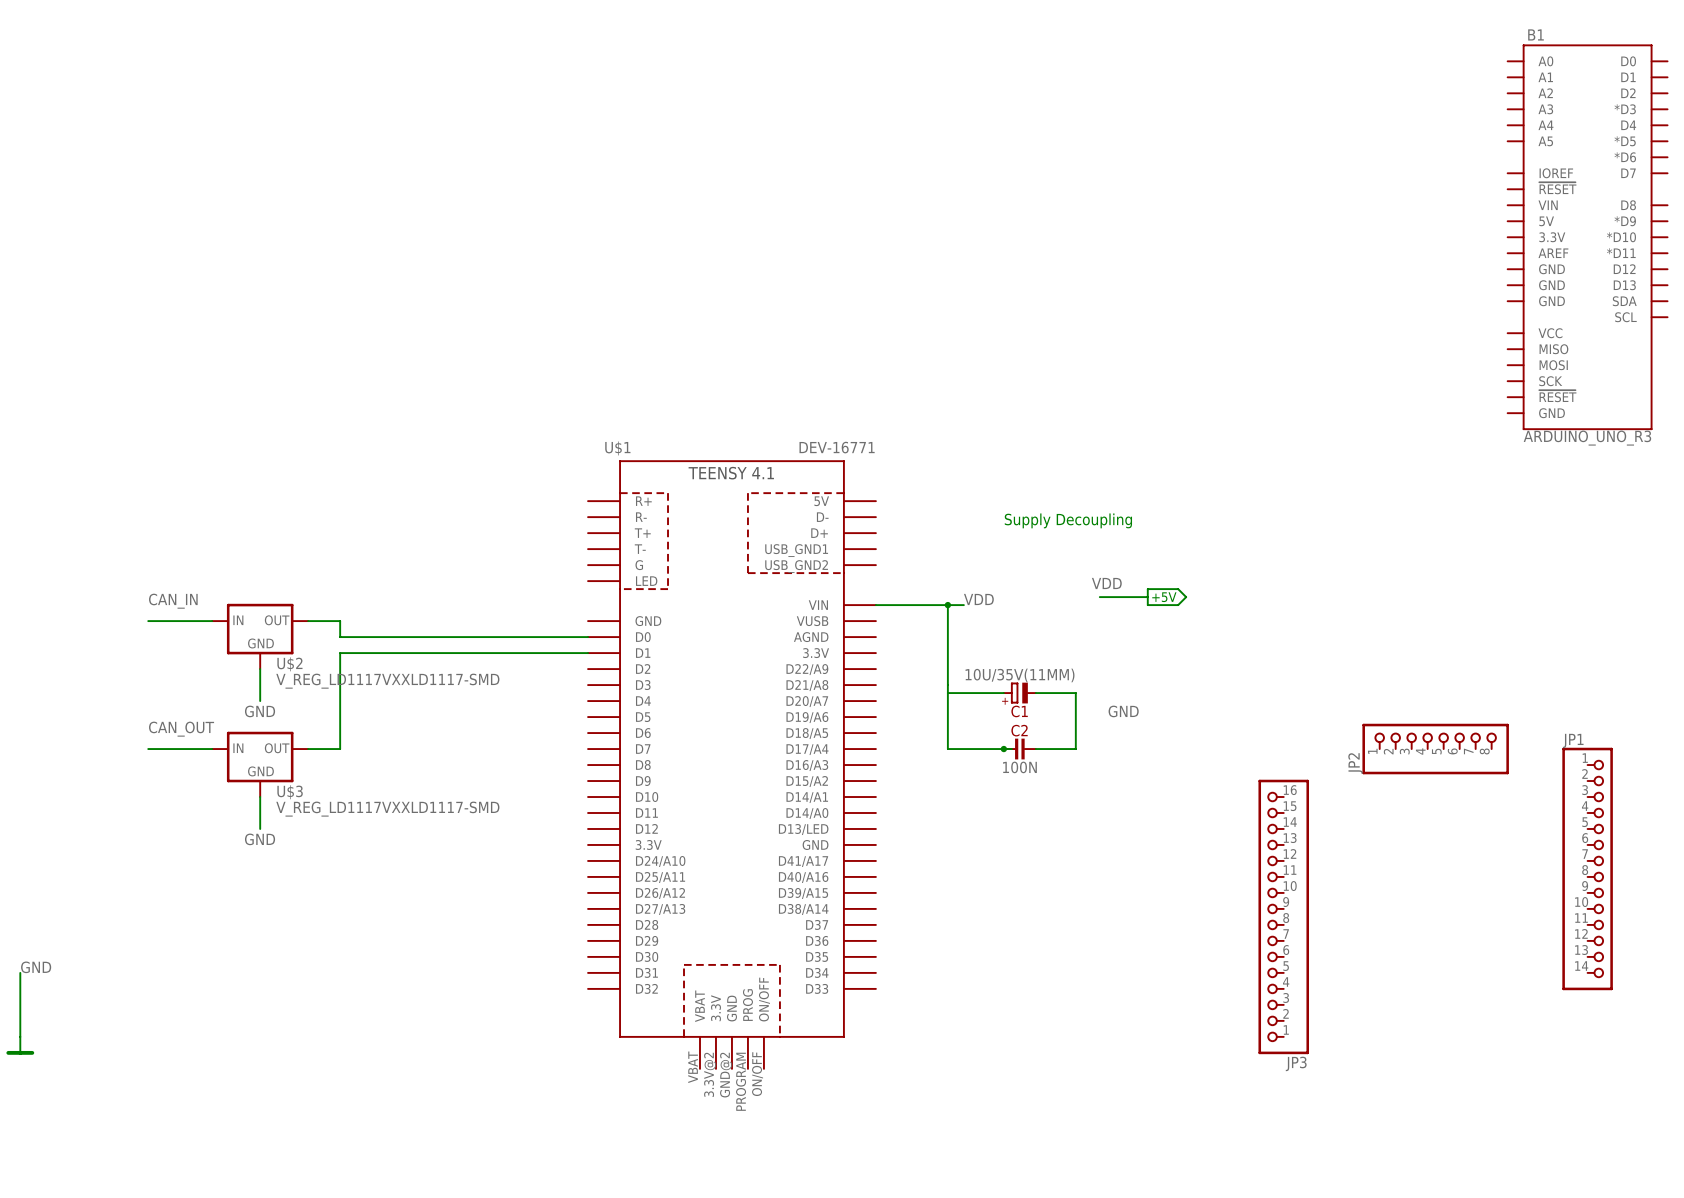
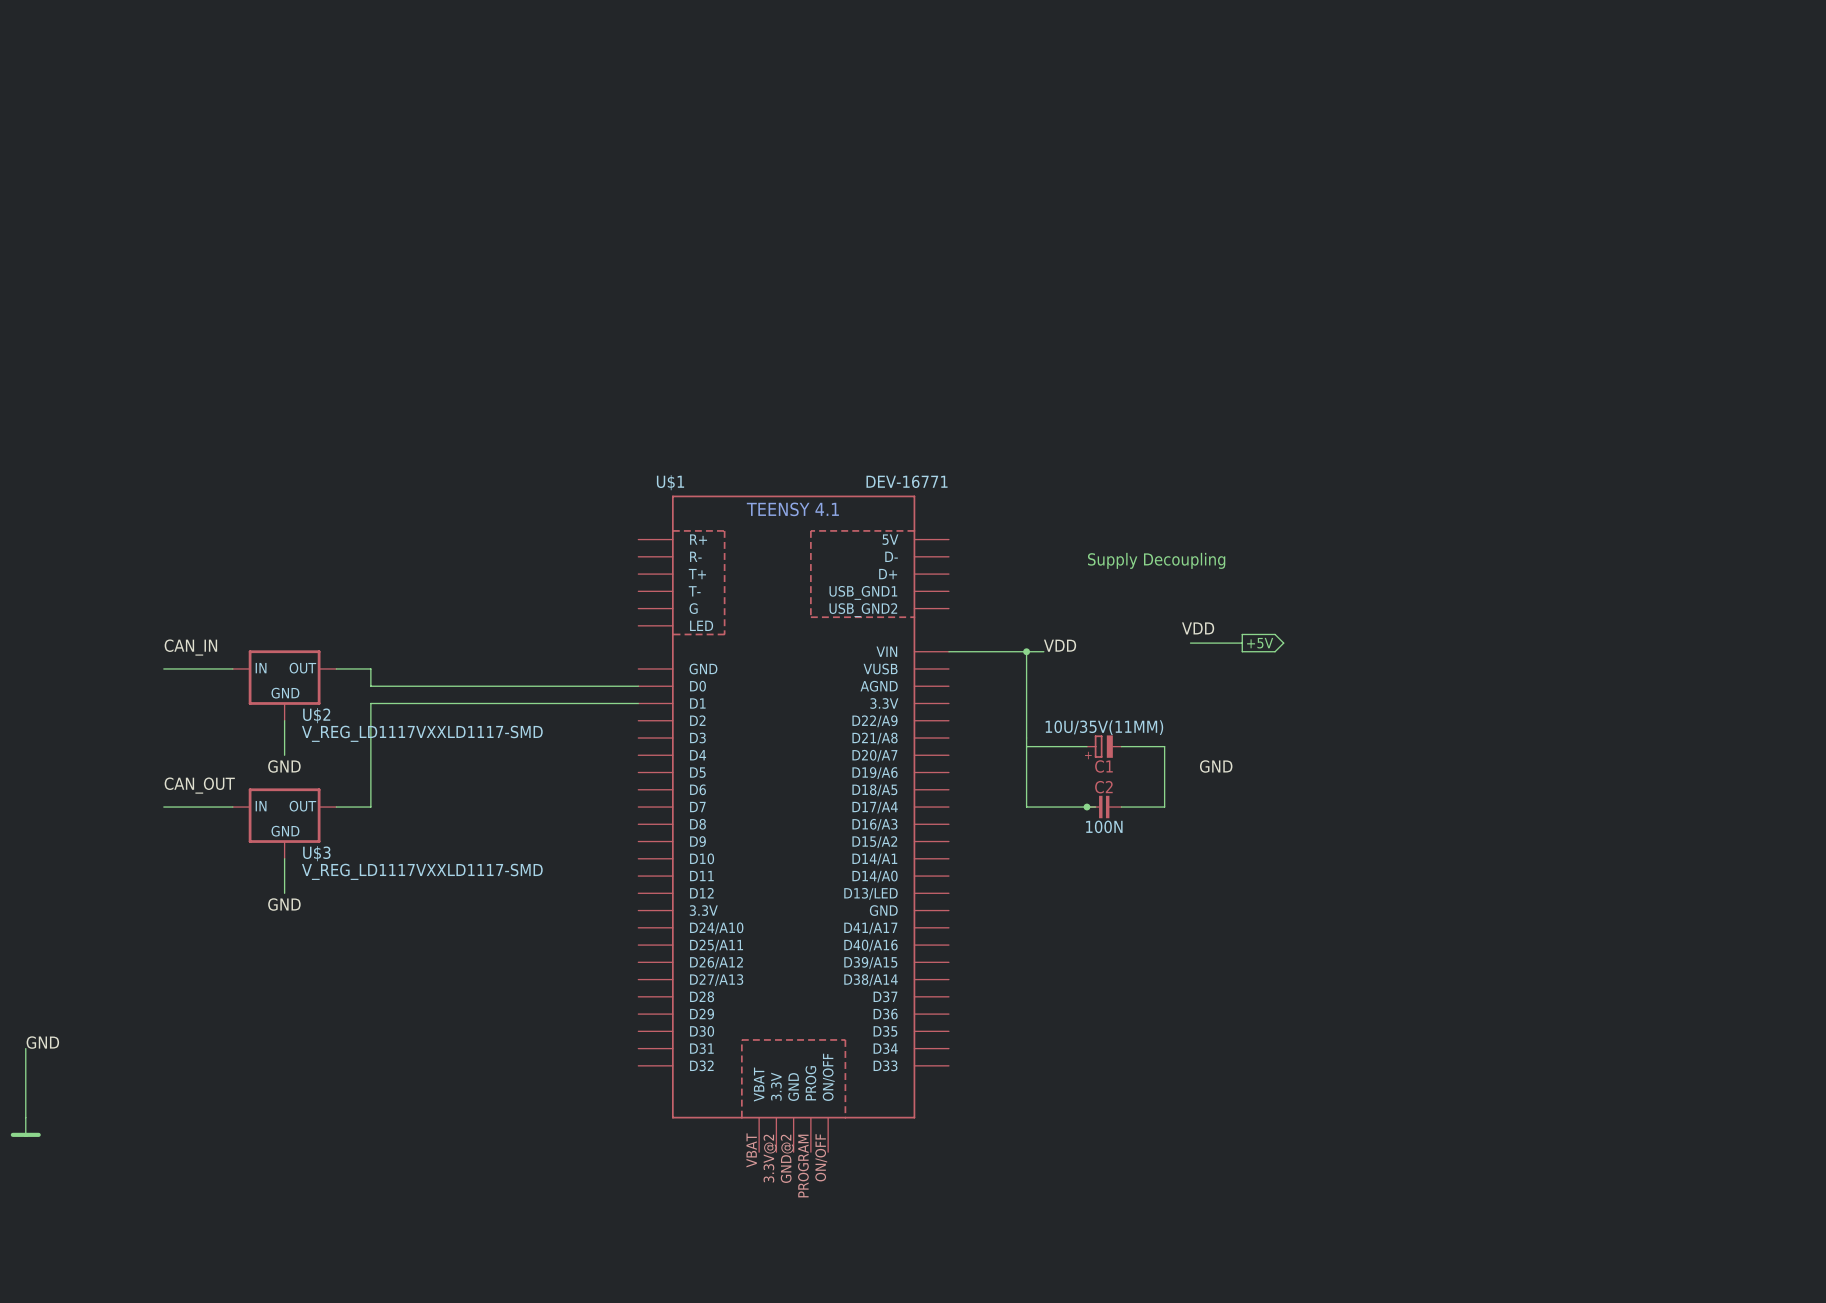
B1: ARDUINO_UNO_R3 (1587, 237) -> none
JP2: (1435, 749) -> none
JP1: (1587, 868) -> none
JP3: (1283, 916) -> none

